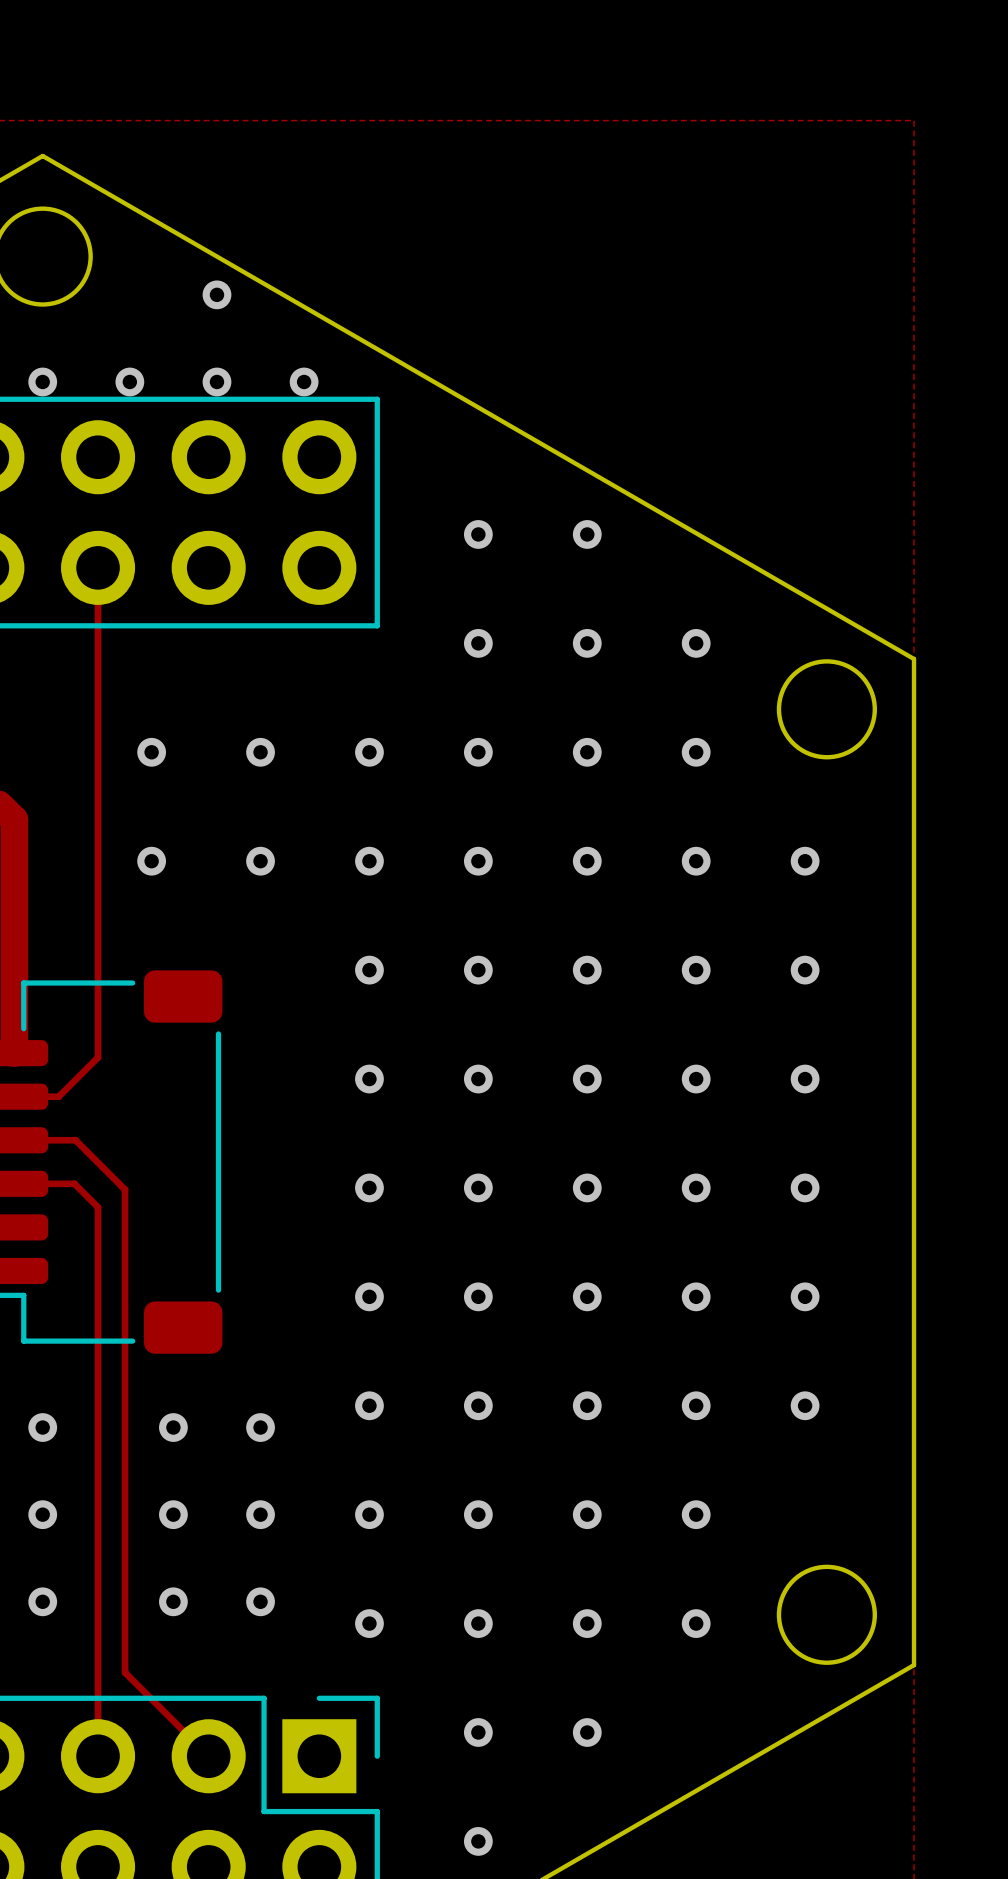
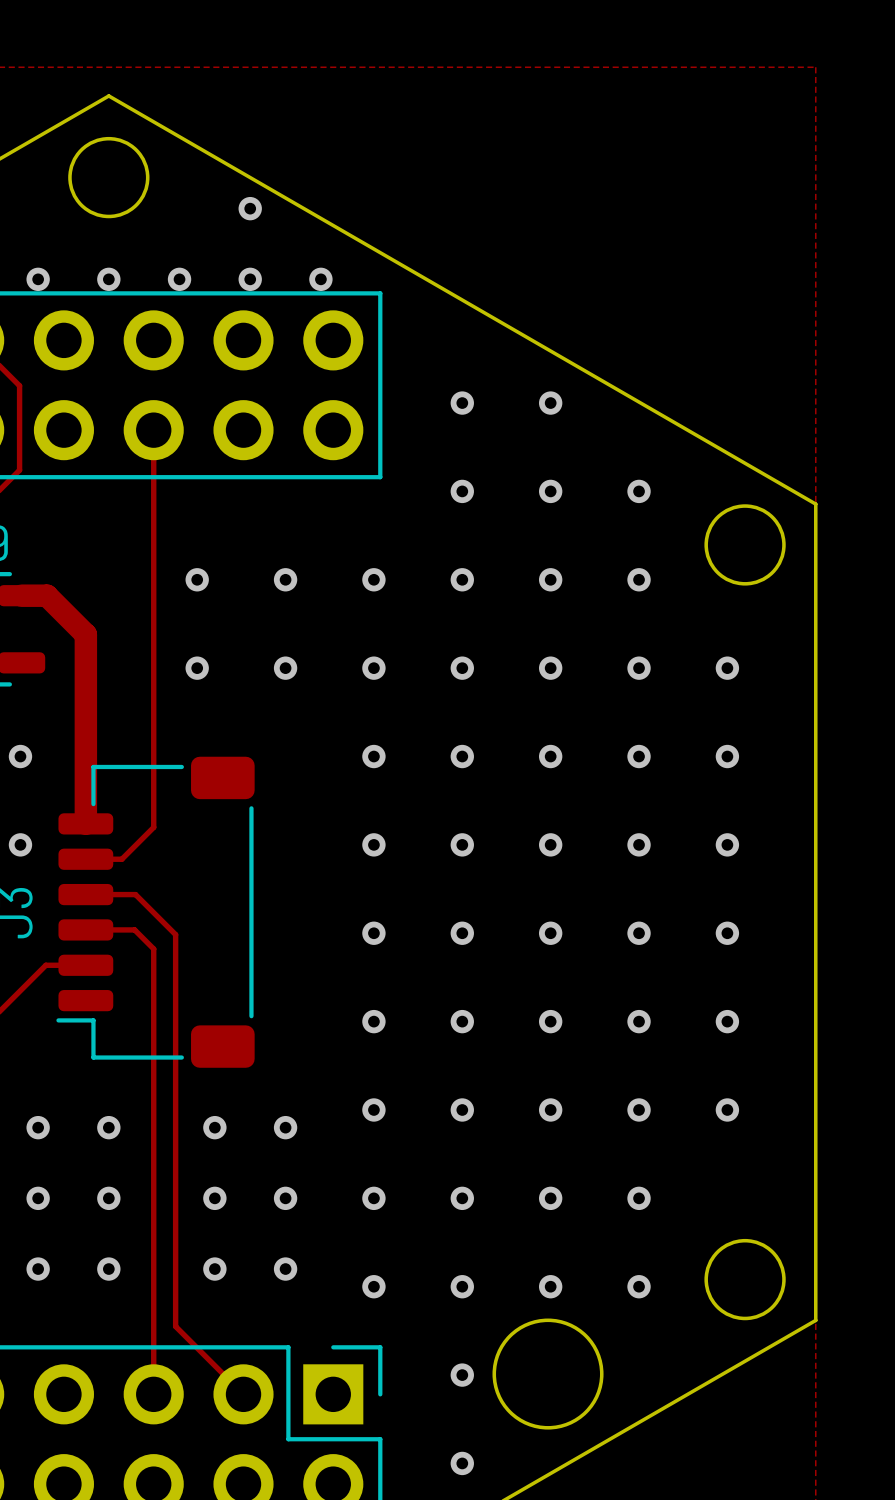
round board edge: none -> [492, 1318, 604, 1430]
via: (587, 1732) -> none

